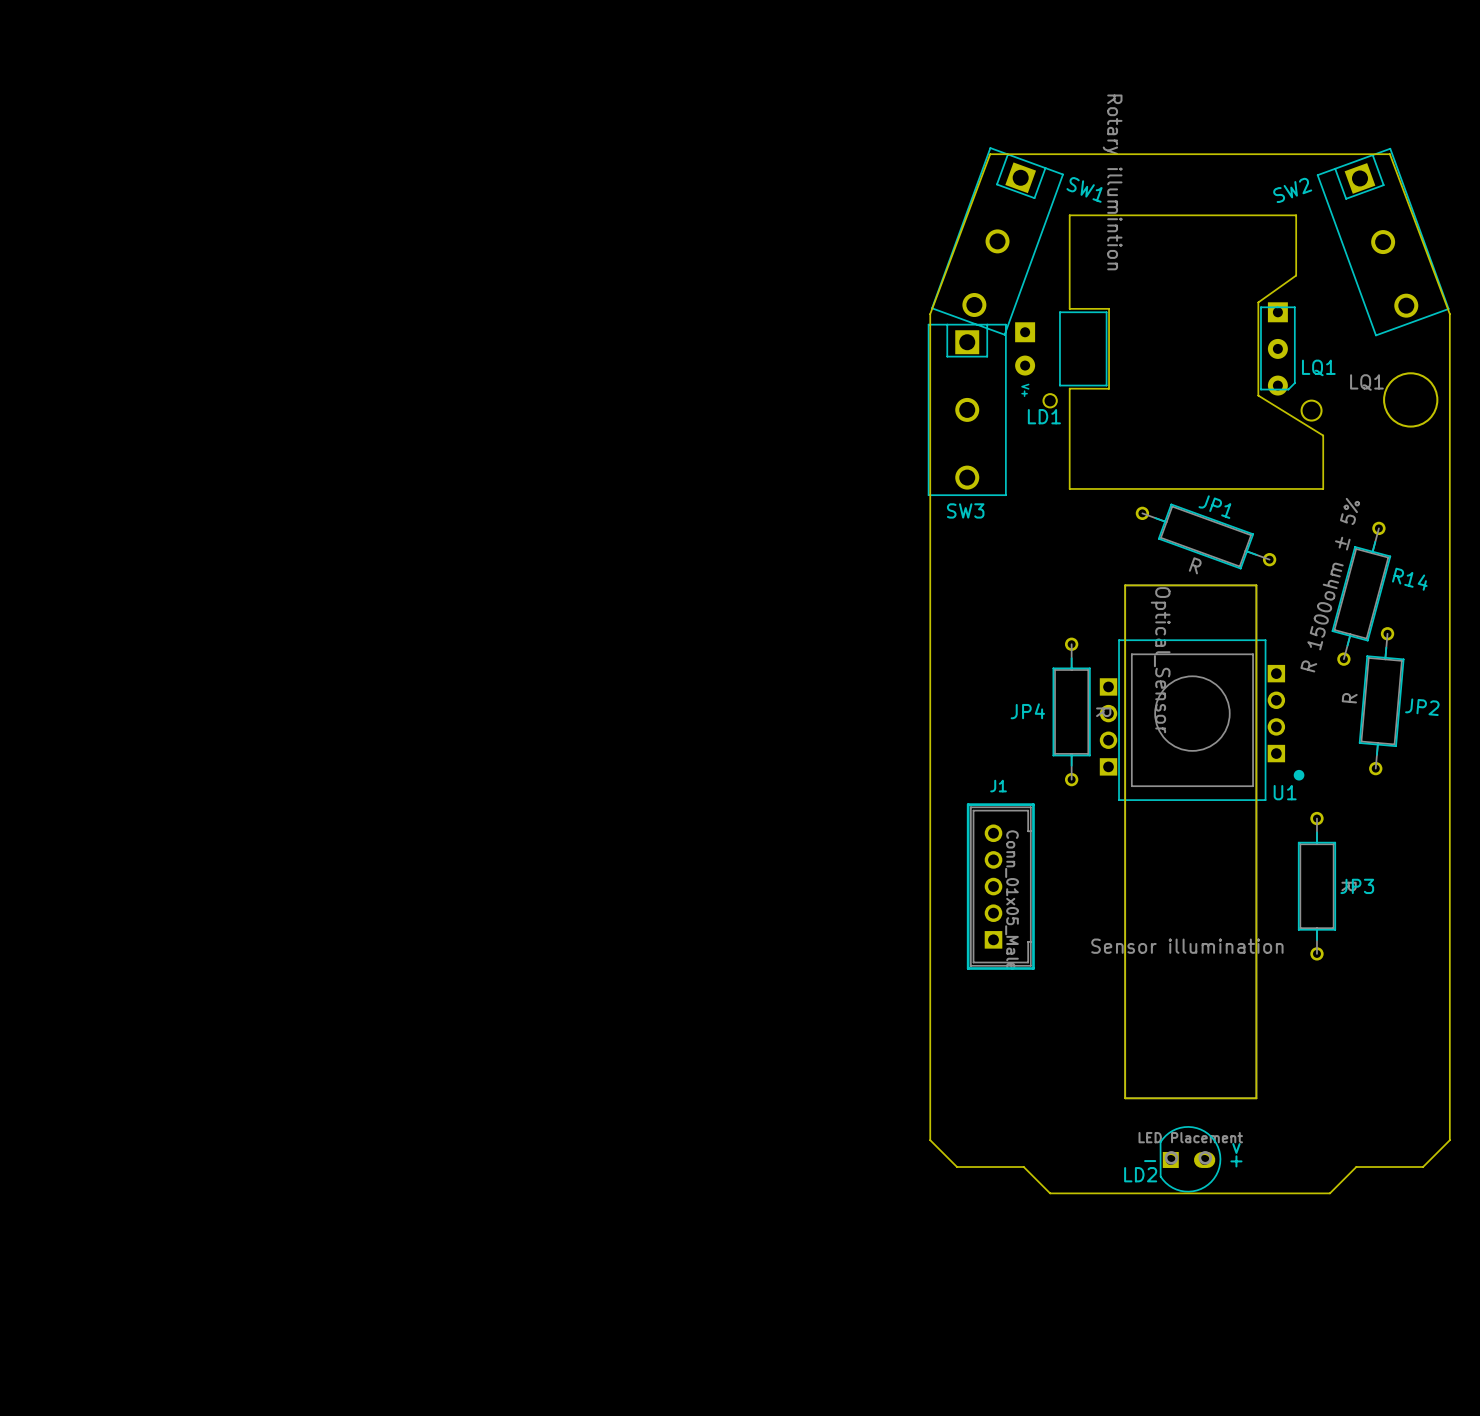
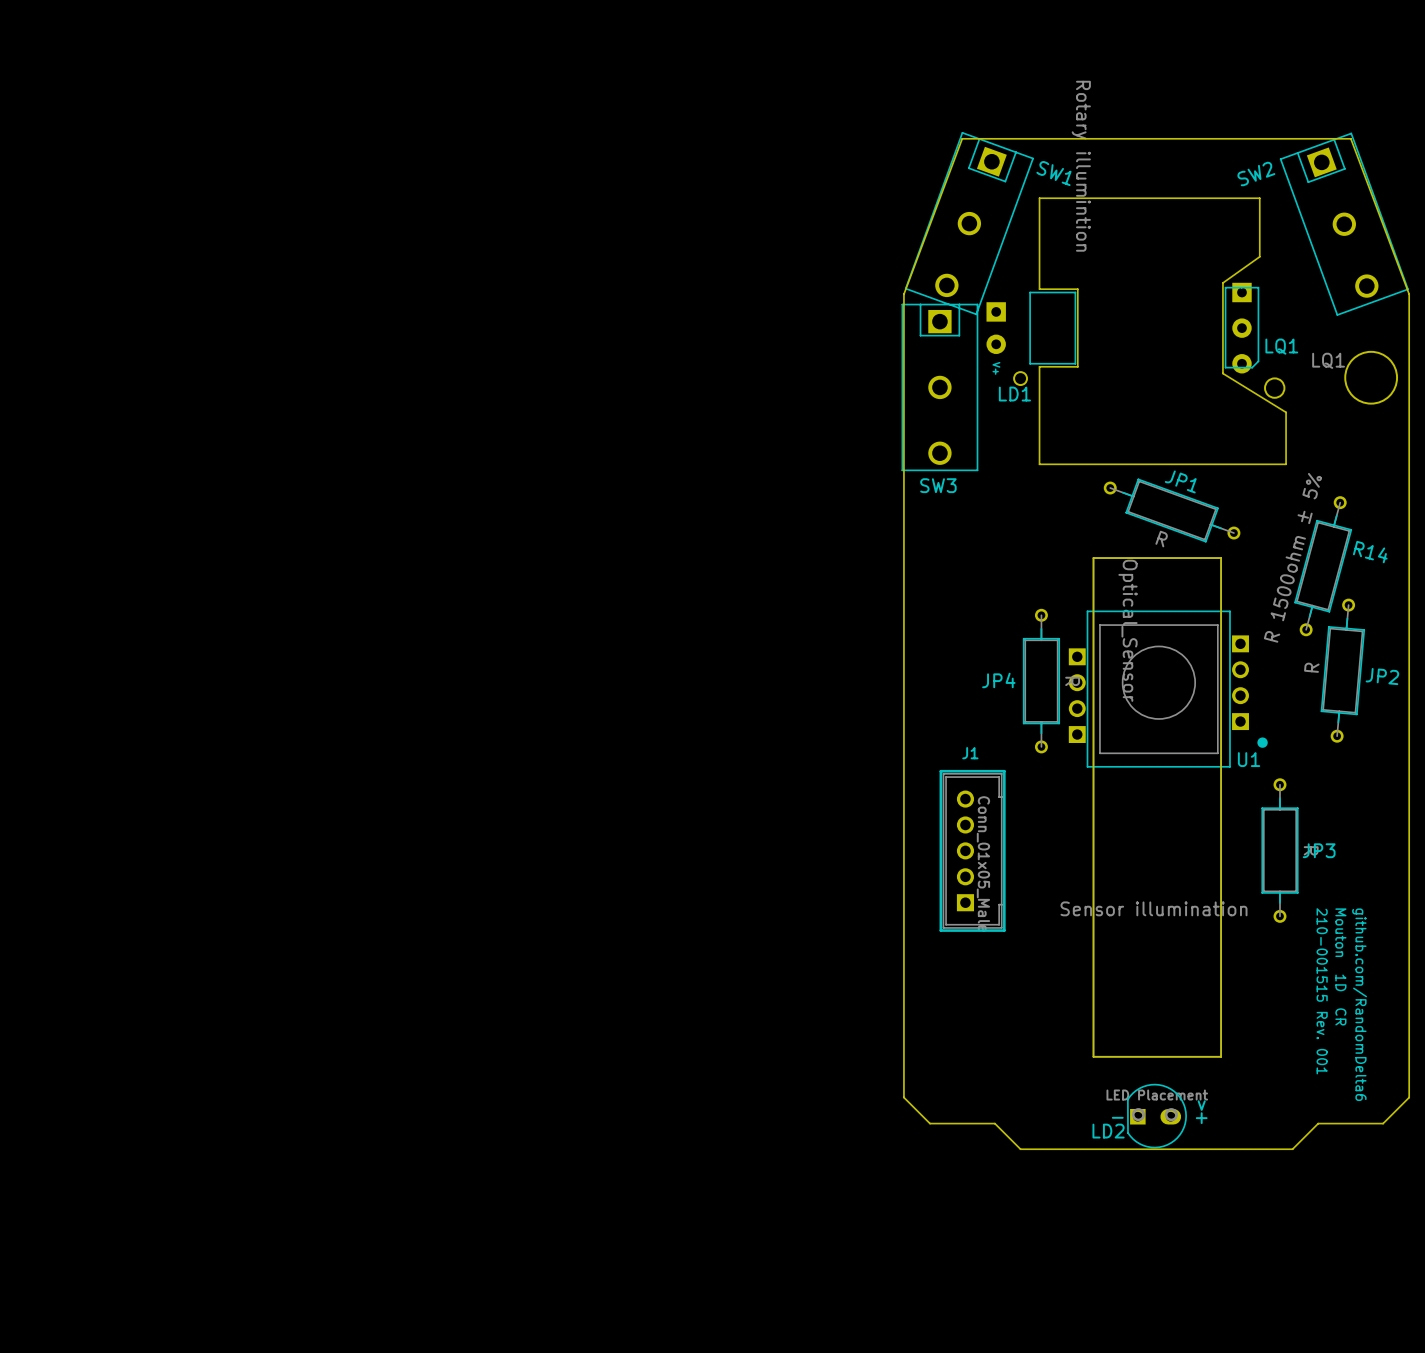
text: none -> Mouton 1D CR (1340, 966)
text: none -> 210-001515 Rev. 001 (1322, 991)
text: none -> github.com/RandomDelta6 (1359, 1004)

